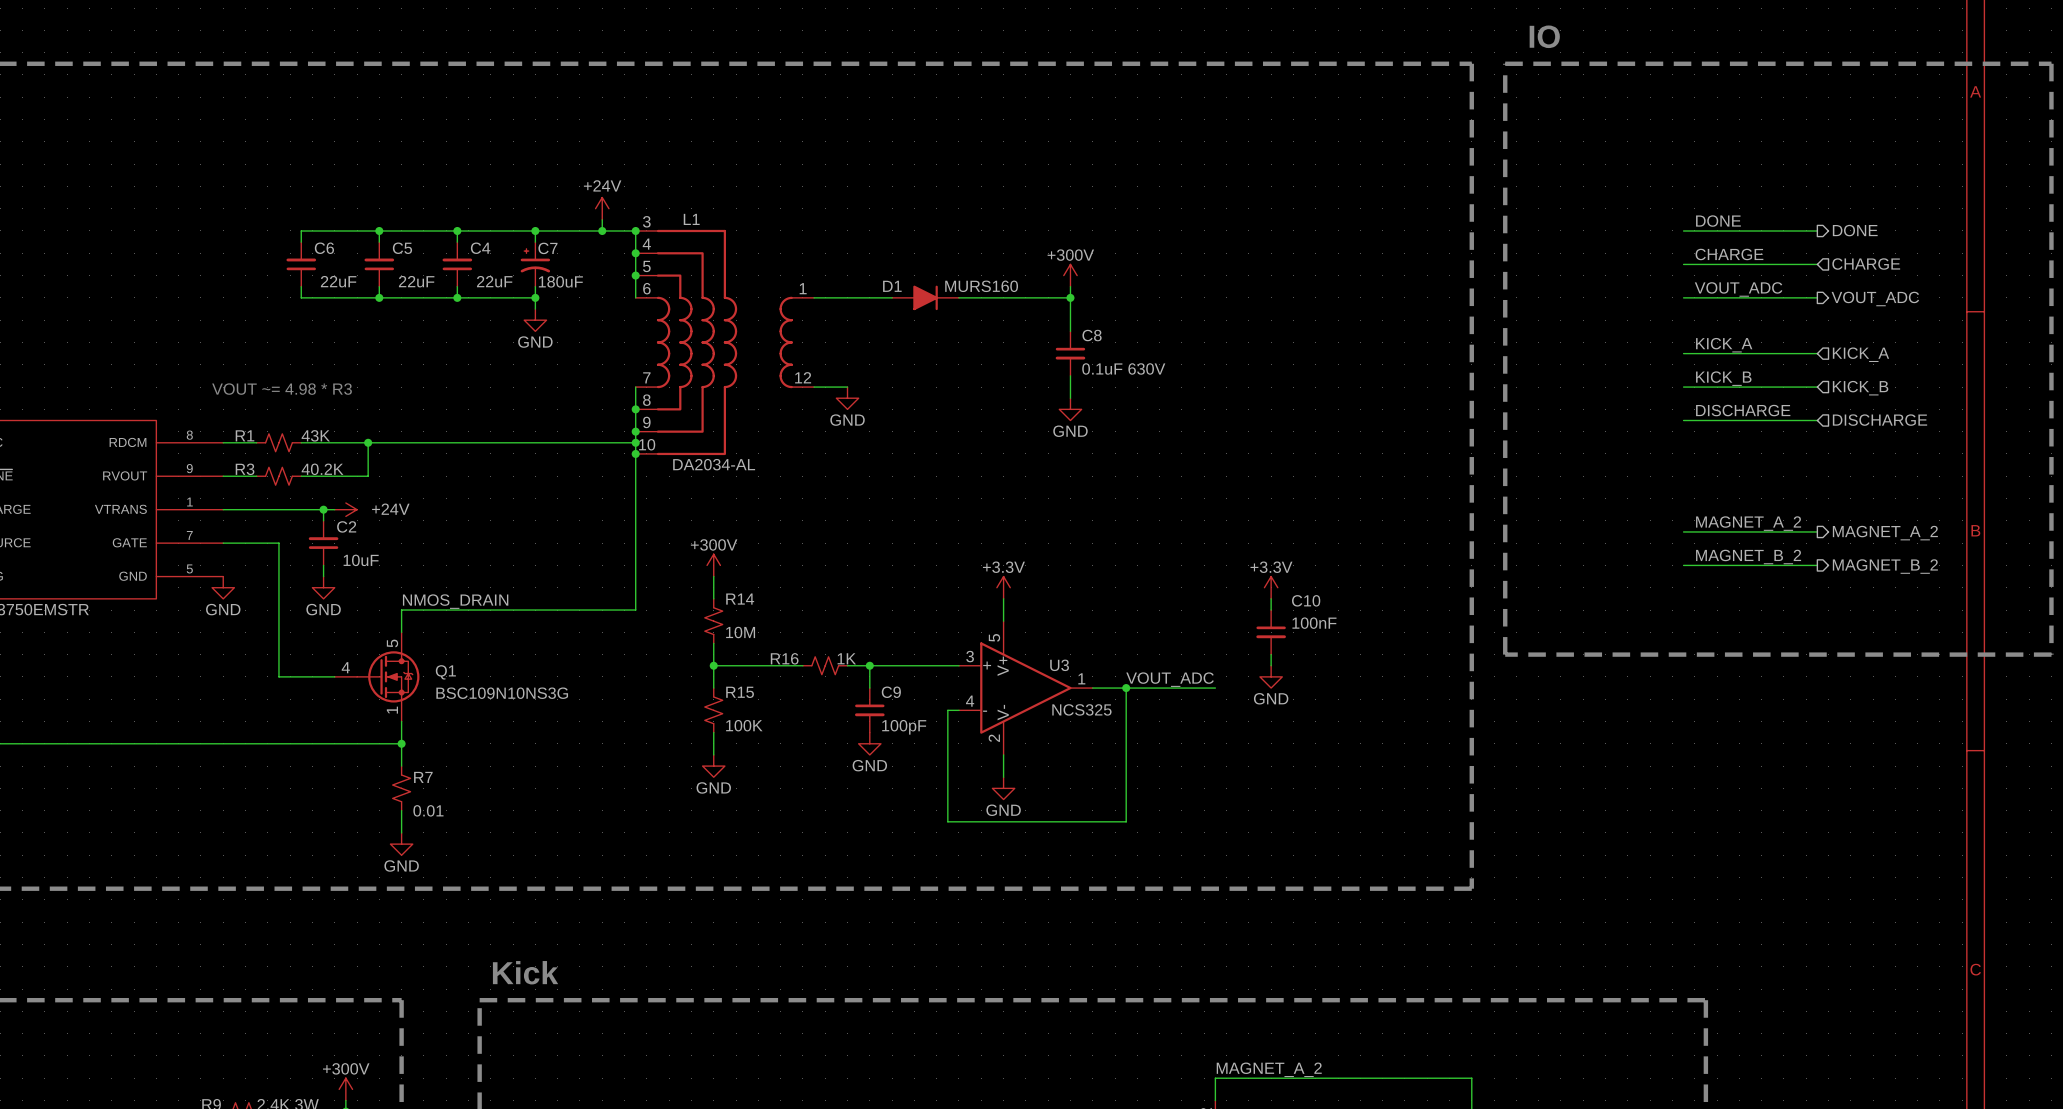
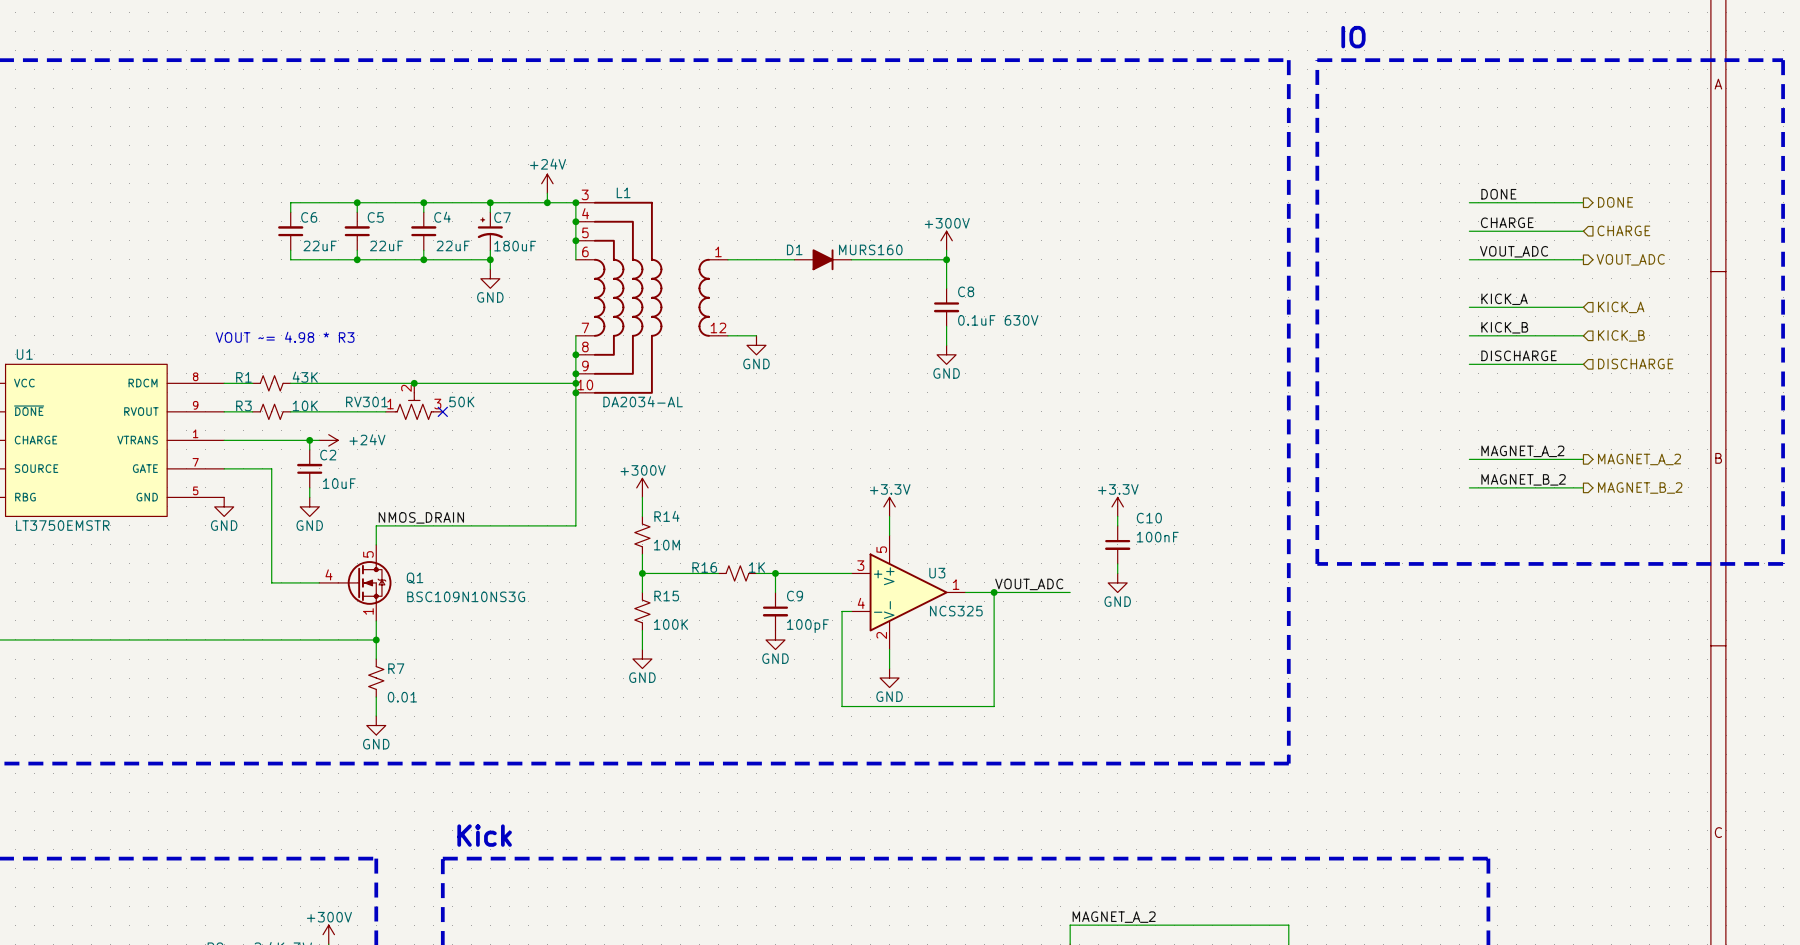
wire: (368, 442) (368, 476) -> (385, 411) (347, 411)
junction: (368, 442) -> none
junction: none -> (414, 383)
RV301: none -> 50K (414, 401)
R3 value: 40.2K (322, 469) -> 10K (305, 405)
no-connect mark: none -> (442, 411)

